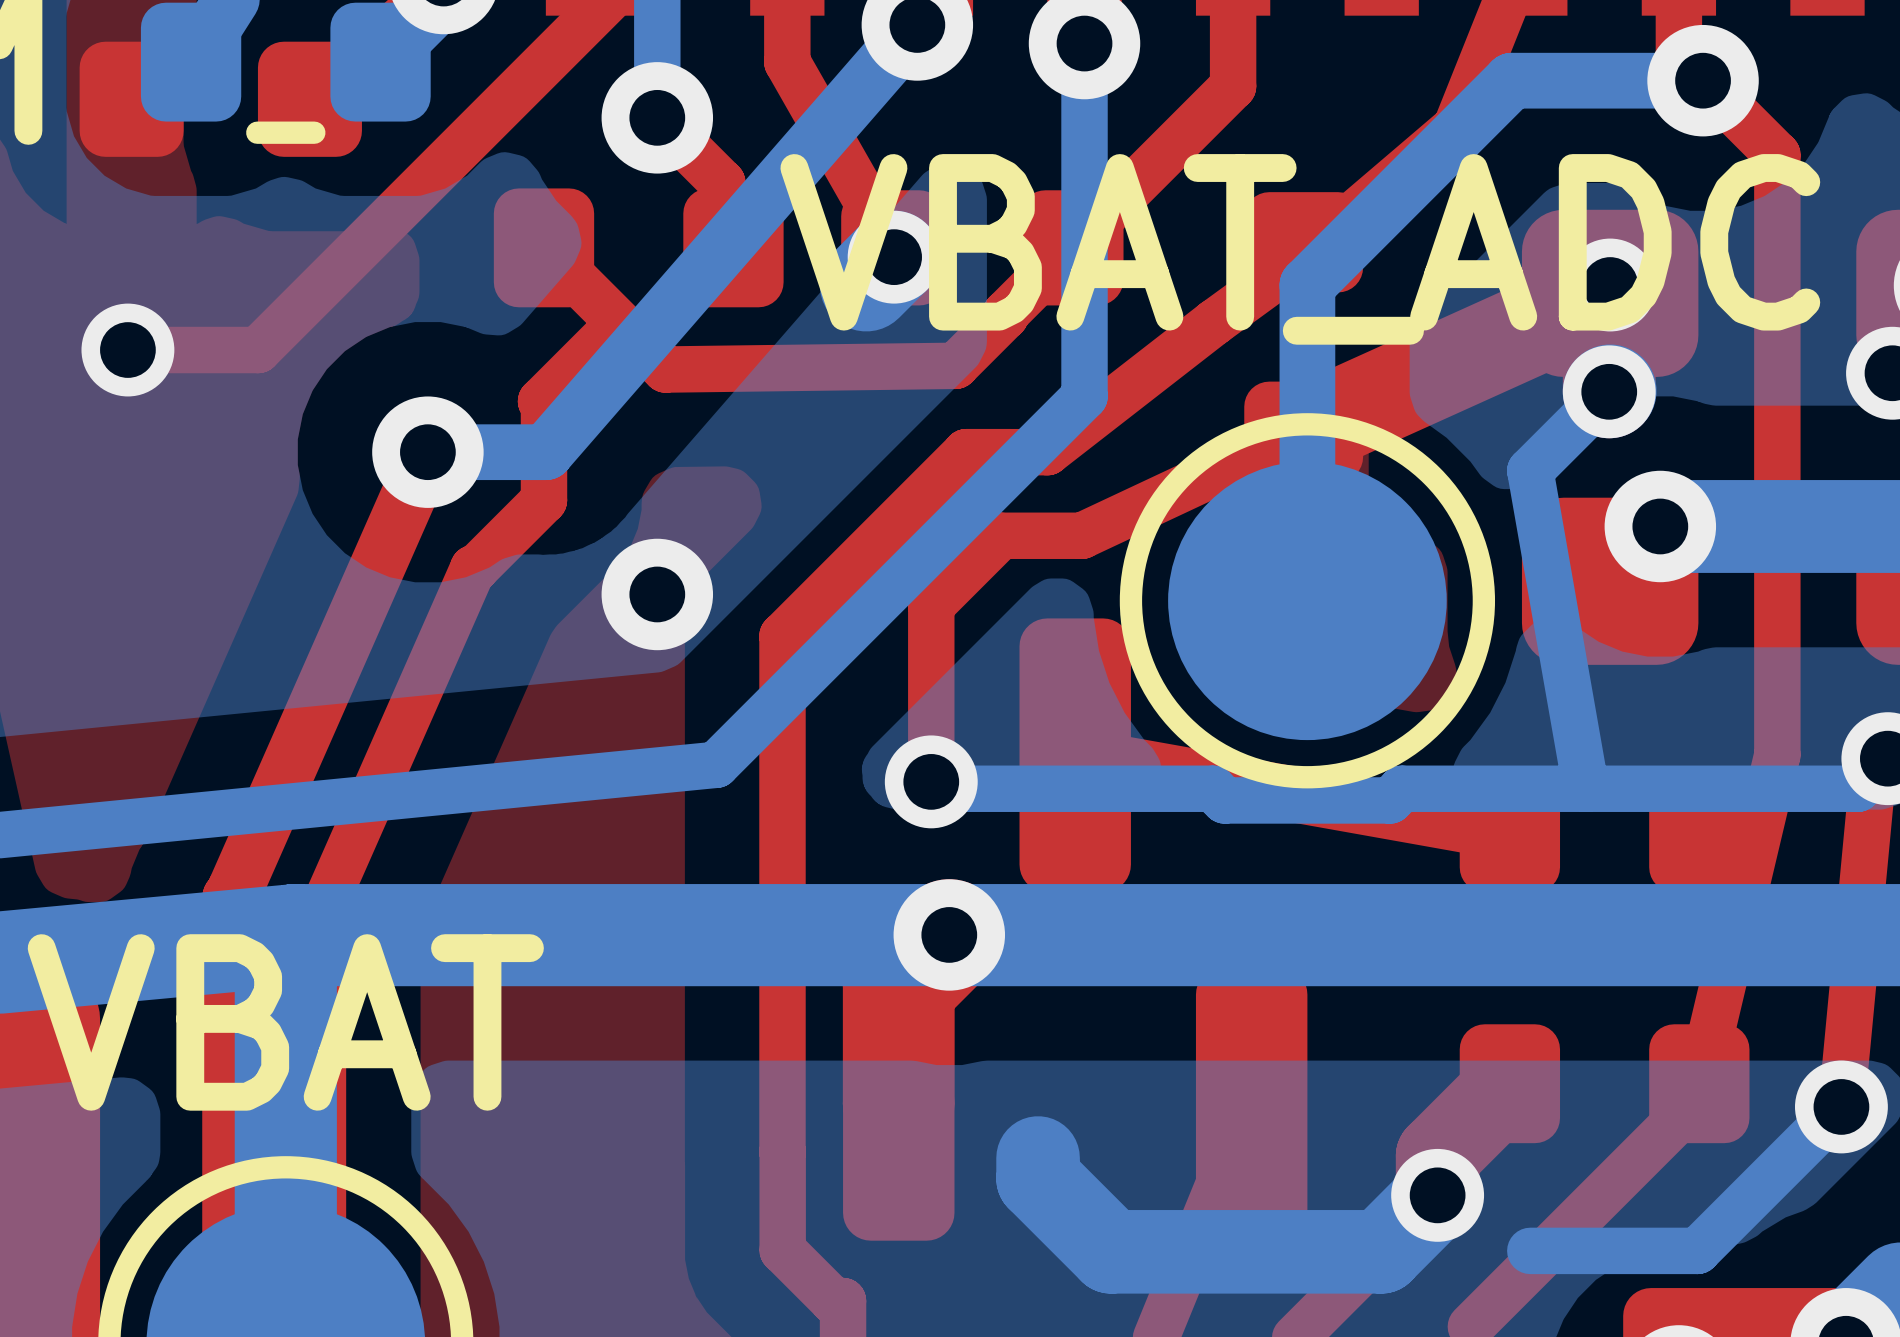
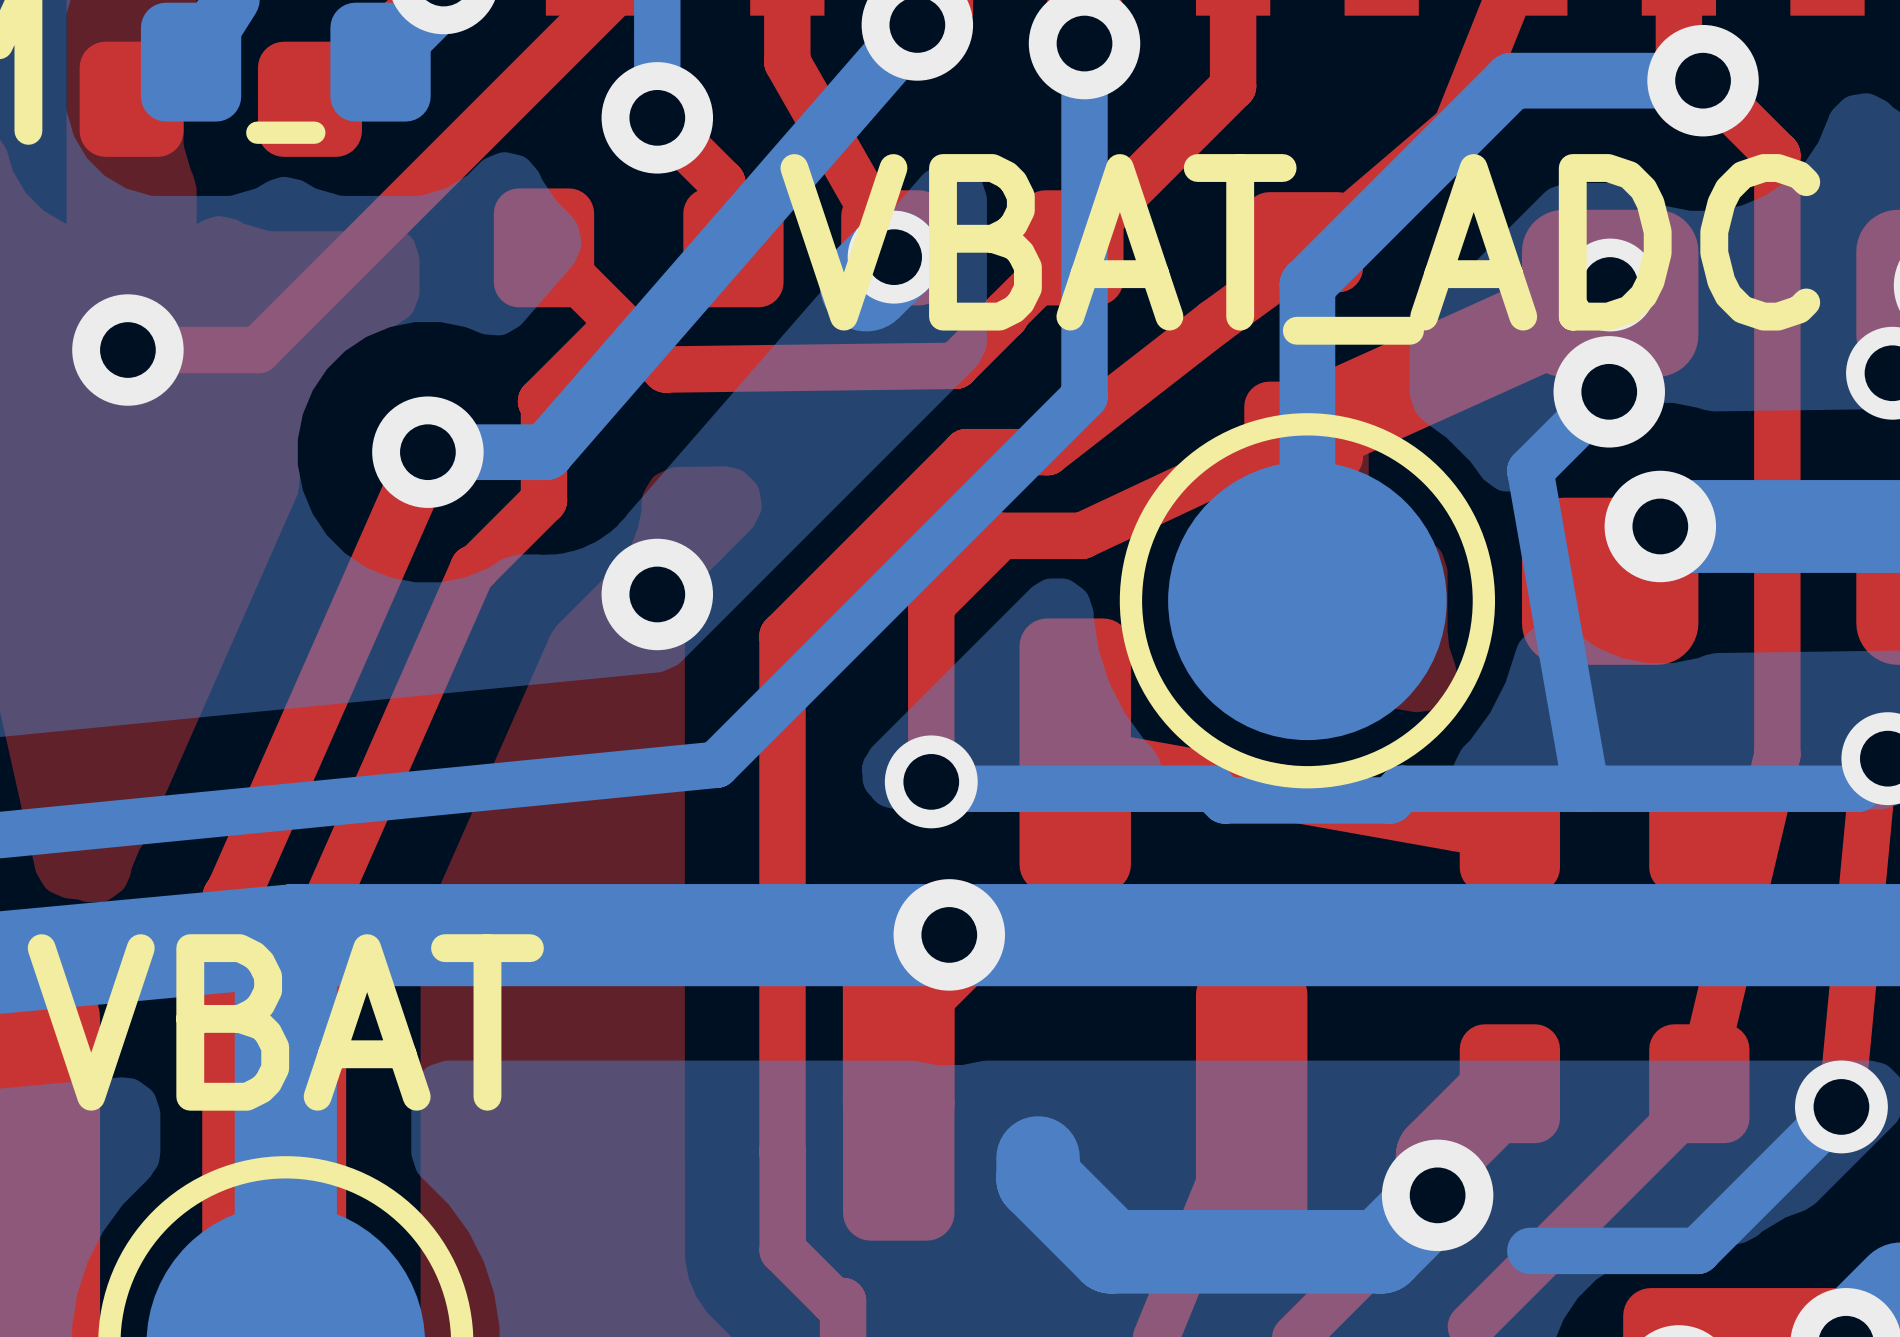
via size: [81, 303, 175, 397] -> [72, 294, 184, 406]
via size: [1562, 345, 1656, 439] -> [1553, 336, 1665, 448]
via size: [1391, 1148, 1485, 1242] -> [1381, 1139, 1494, 1252]

